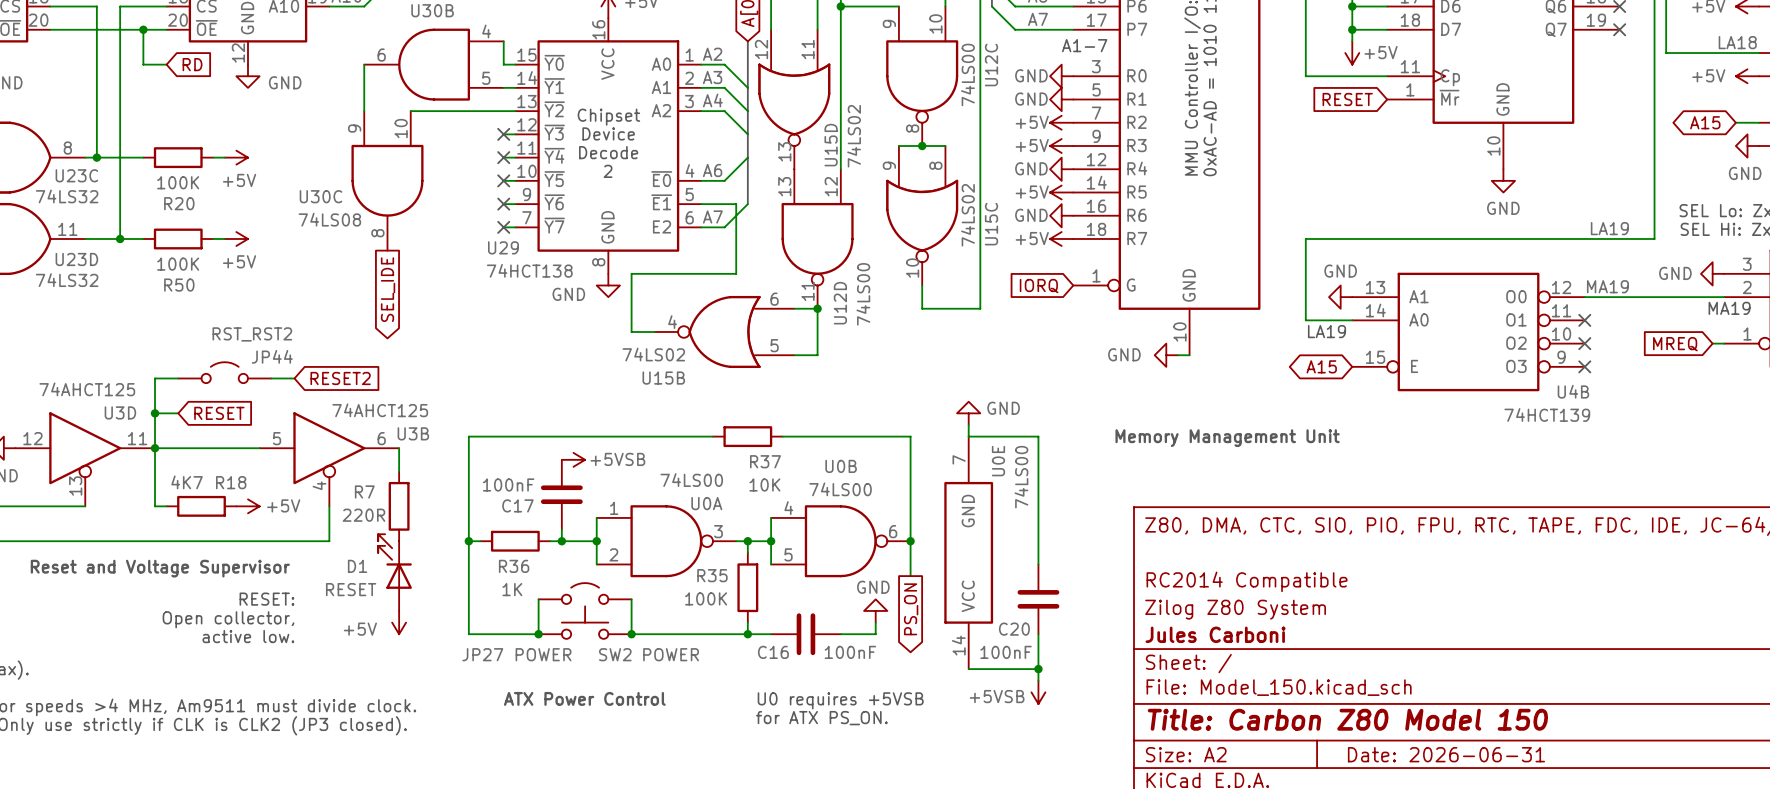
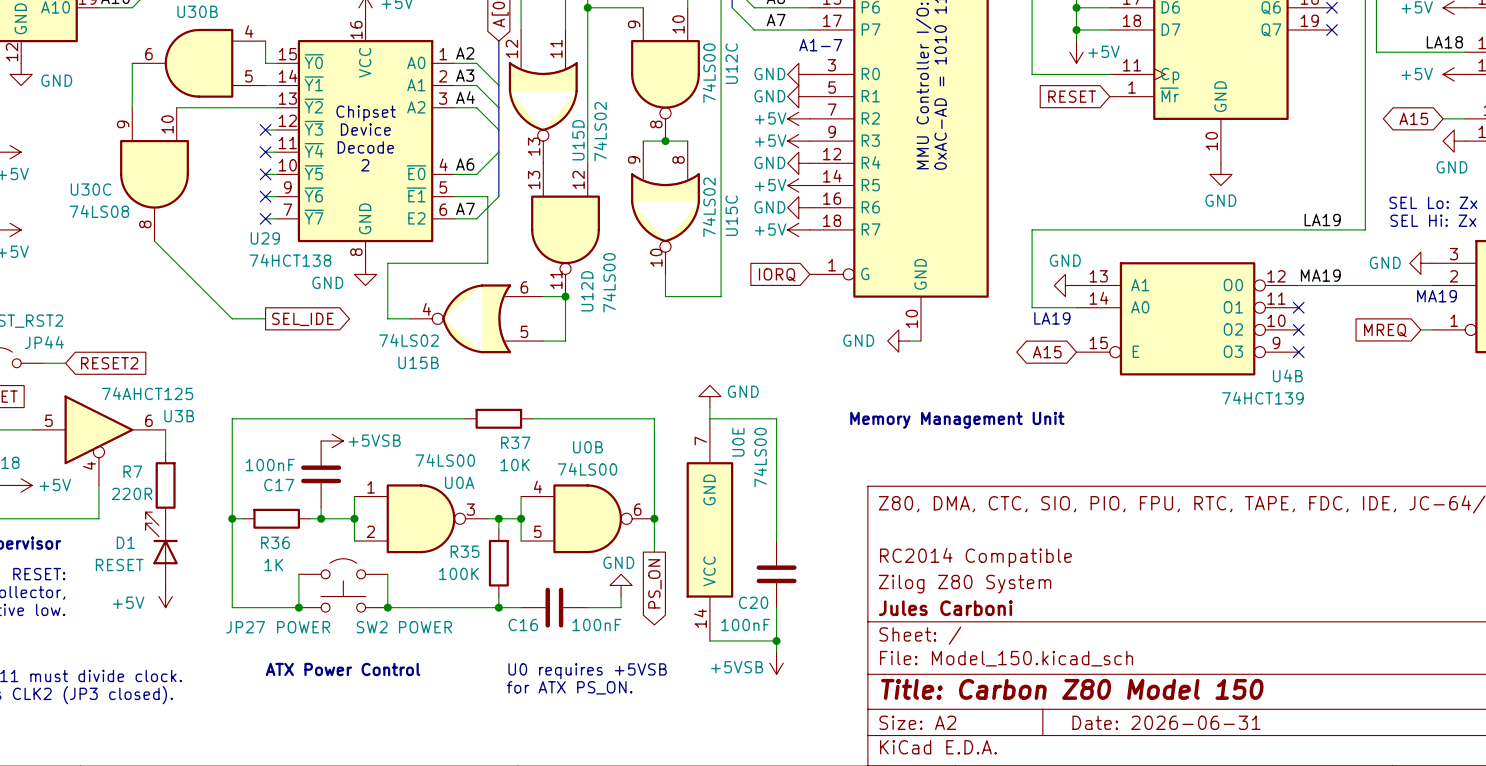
wire: none -> (154, 241) (232, 318) (265, 318)
global label rotation: 0° (388, 289) -> 90° counterclockwise (302, 319)
global label position: SEL_IDE (388, 289) -> SEL_IDE (302, 319)

